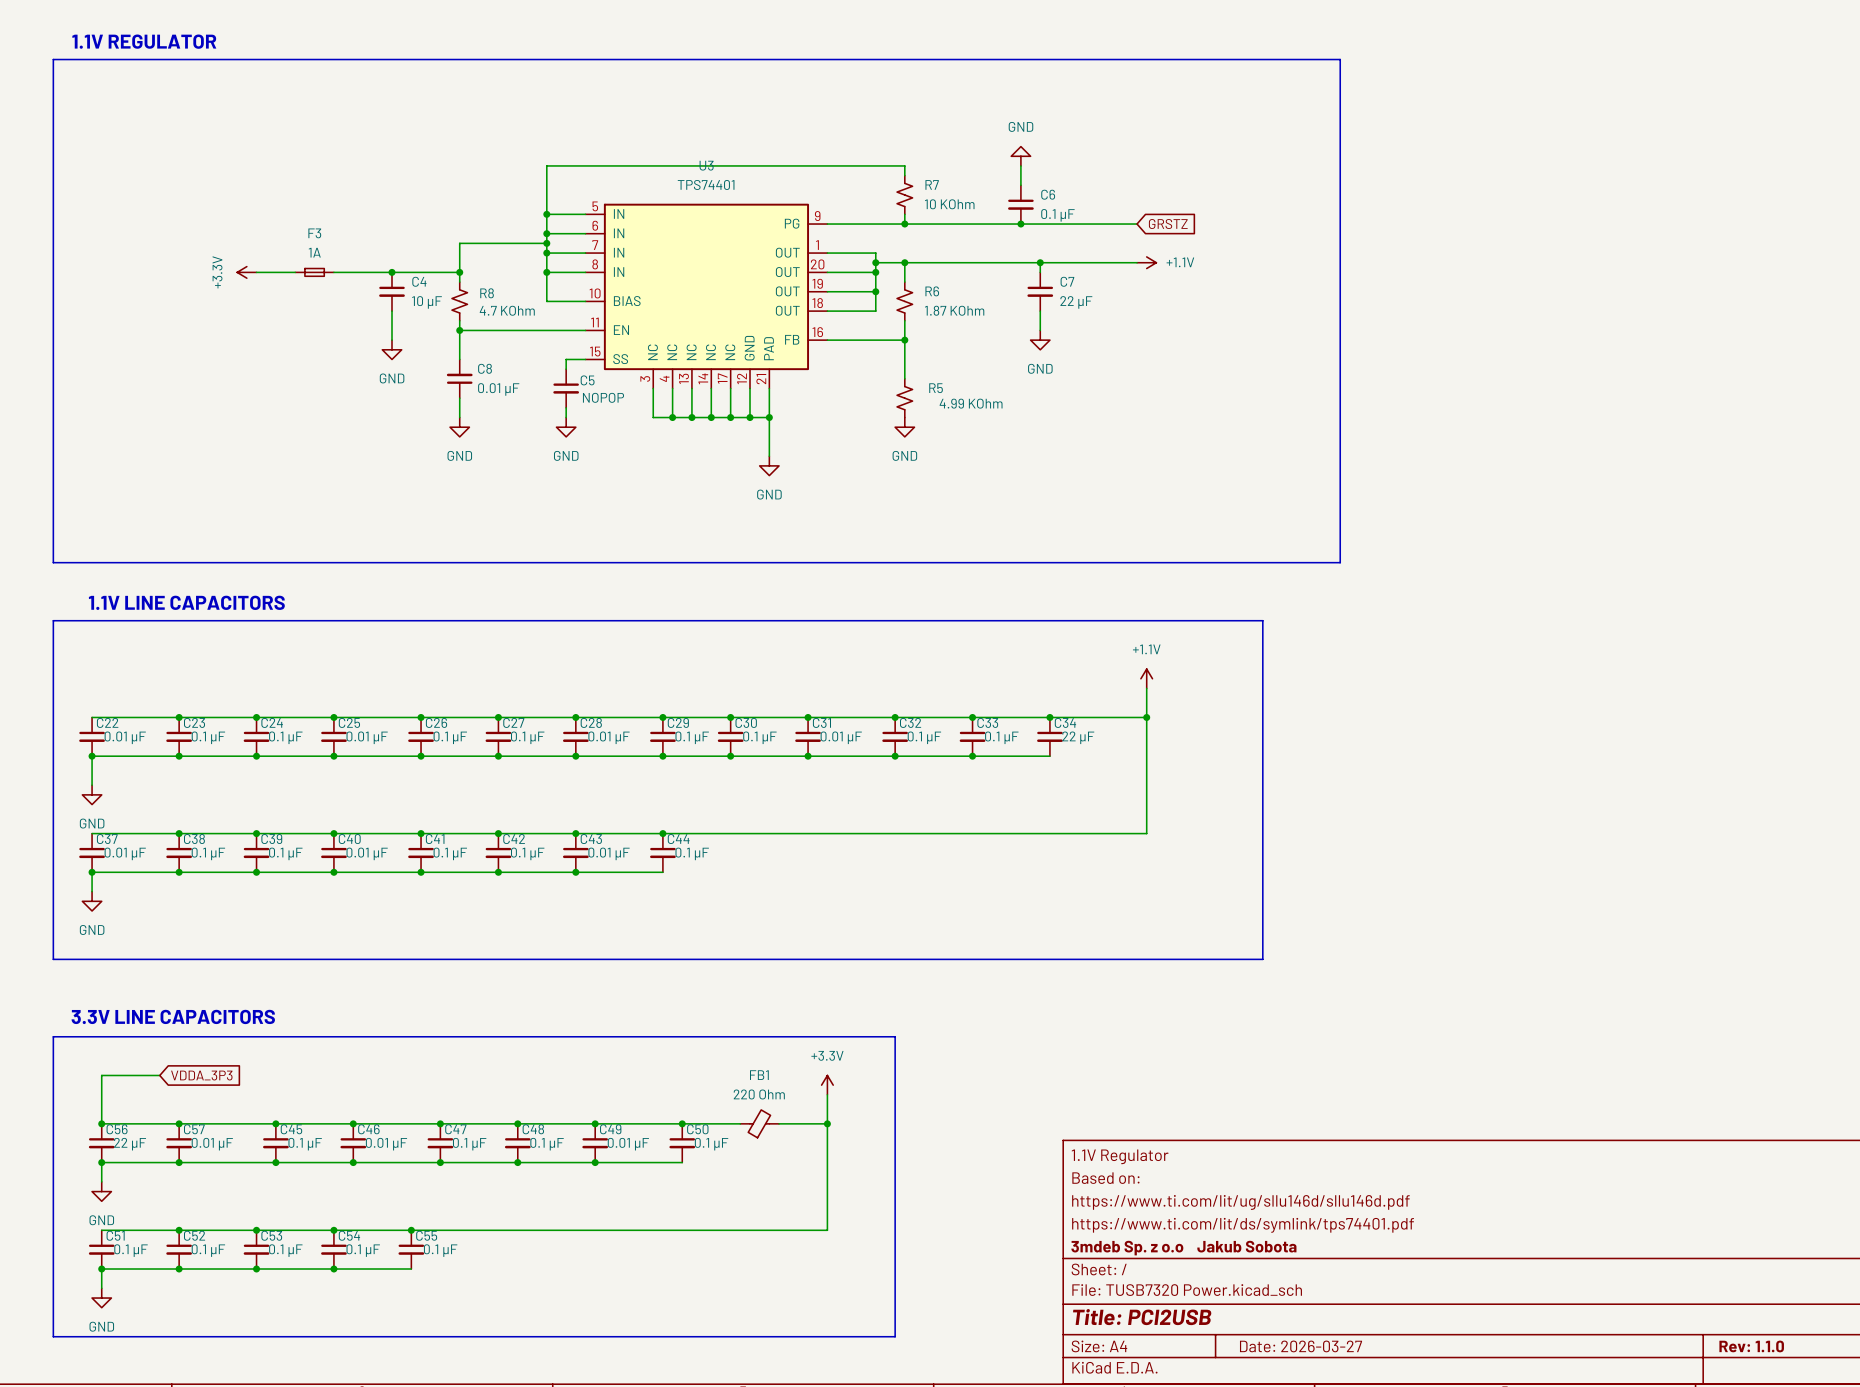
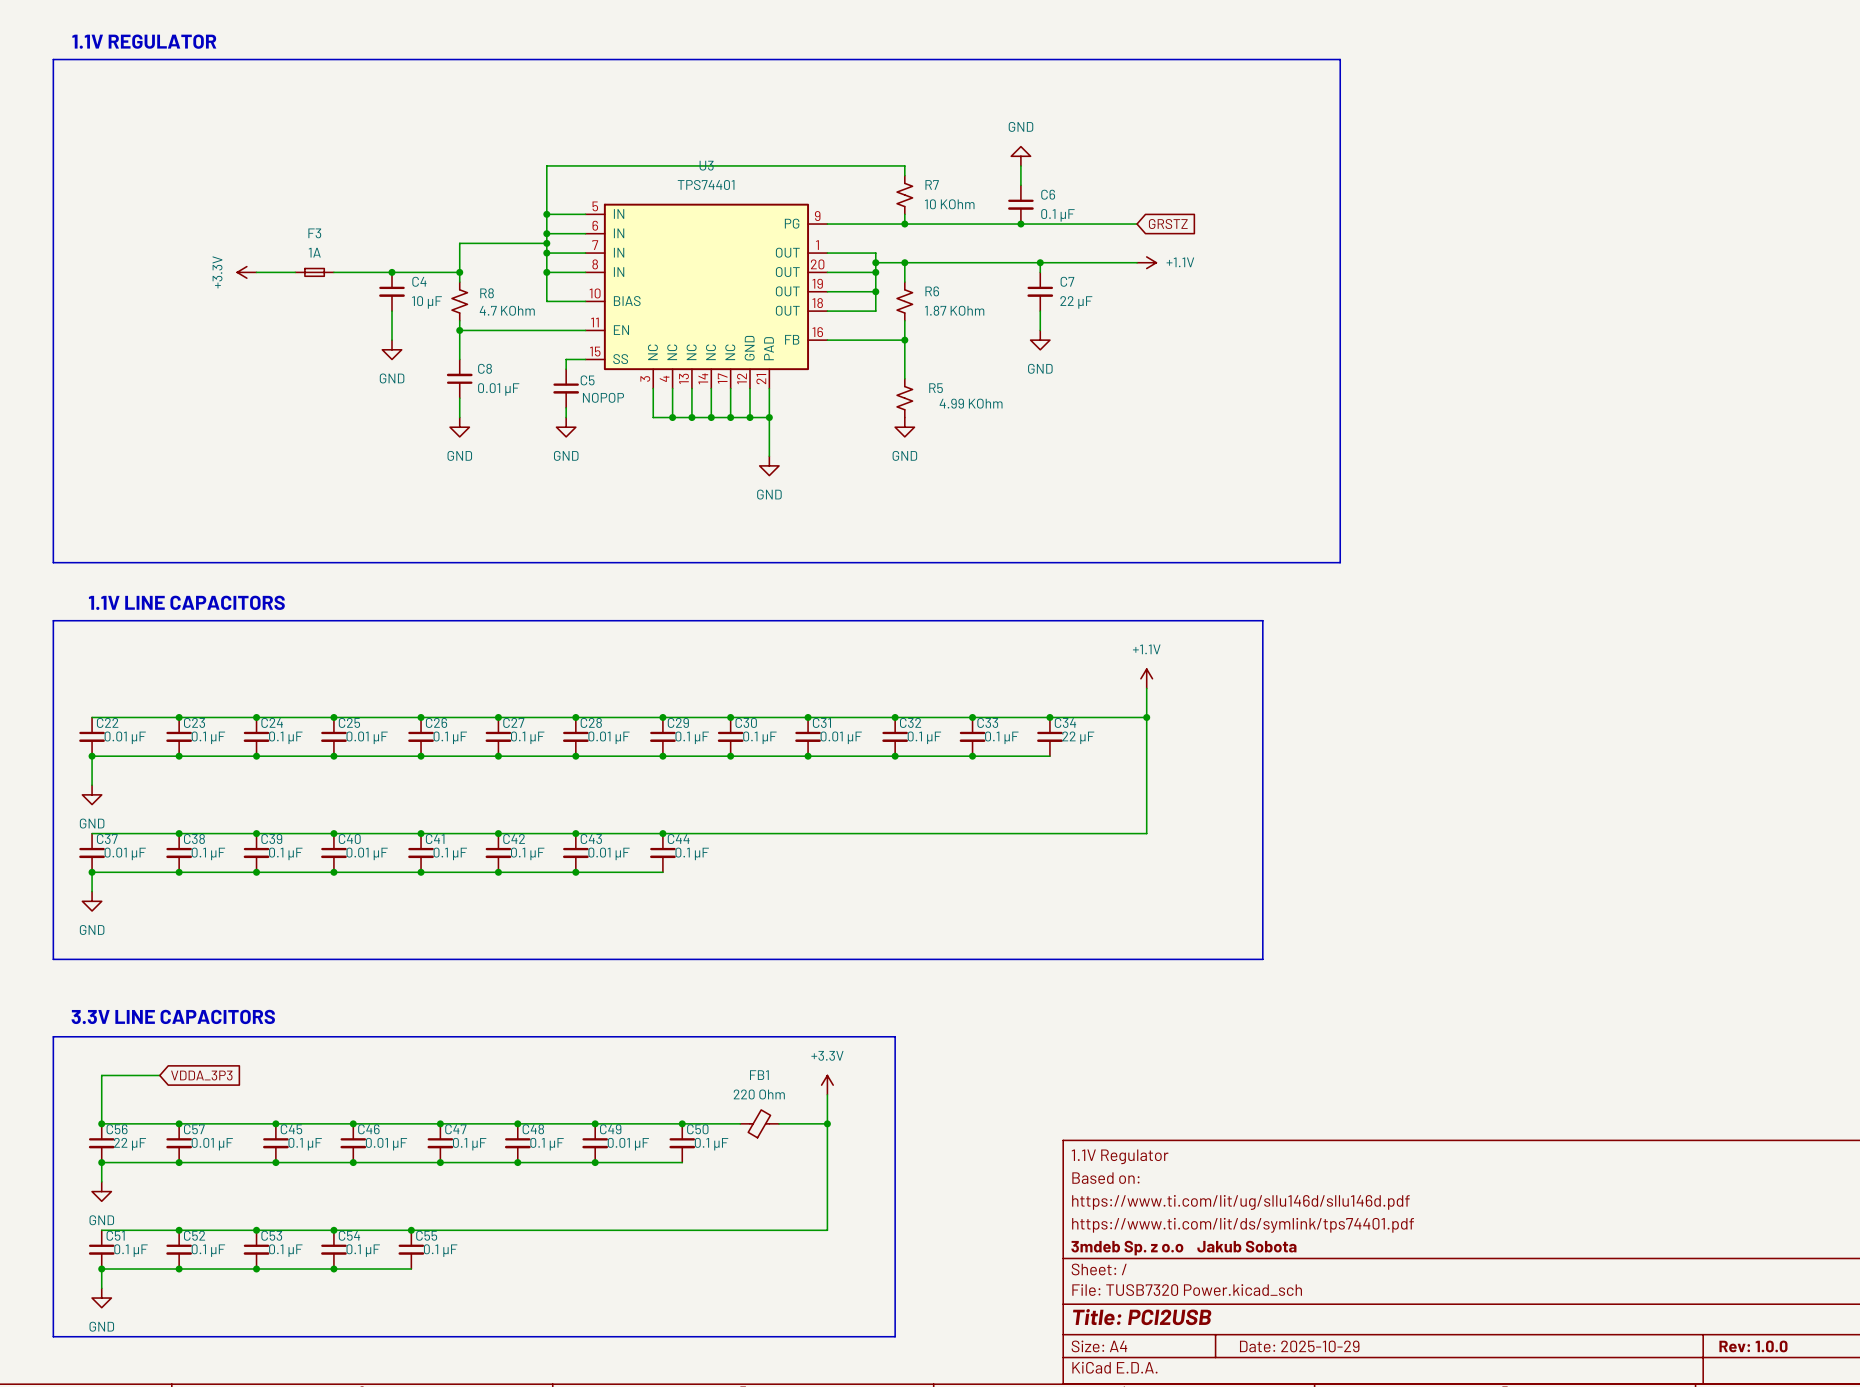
title block: Date: 2026-03-27 (1301, 1346) -> Date: 2025-10-29 (1299, 1346)
title block: Rev: 1.1.0 (1751, 1346) -> Rev: 1.0.0 (1753, 1346)

